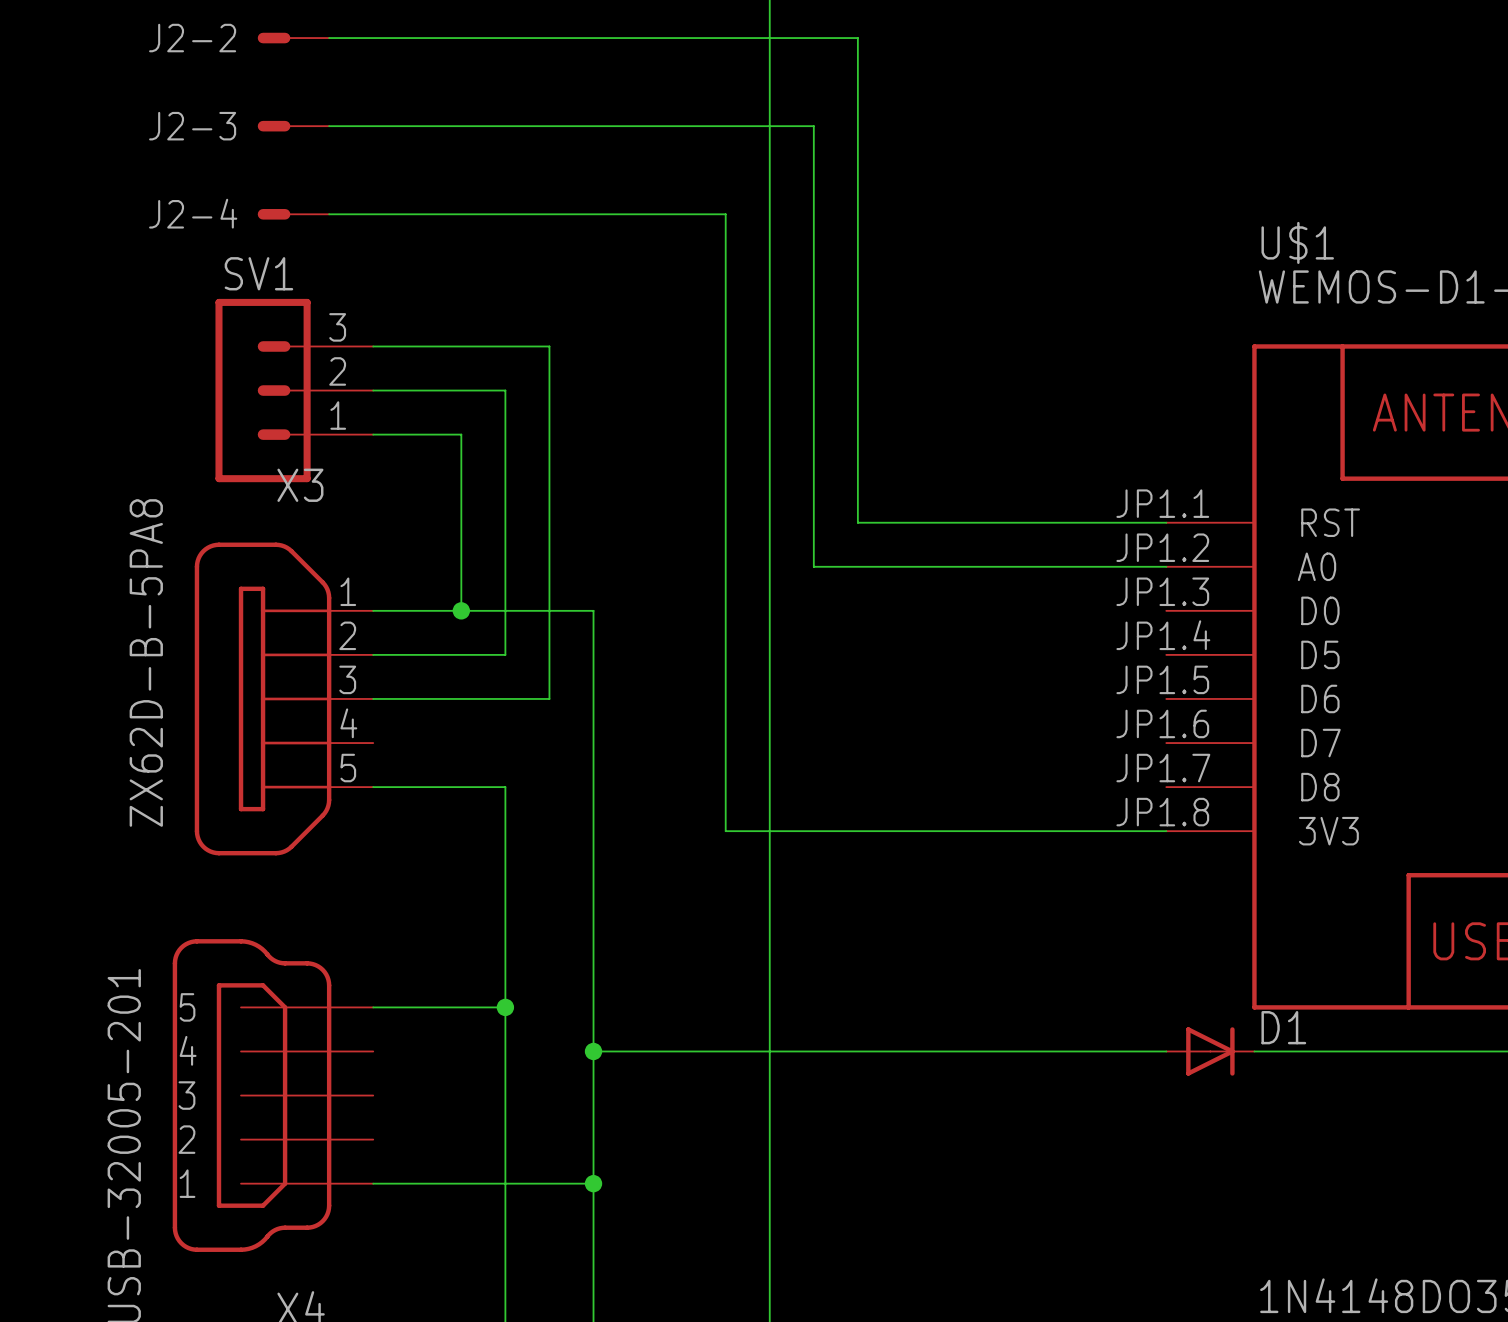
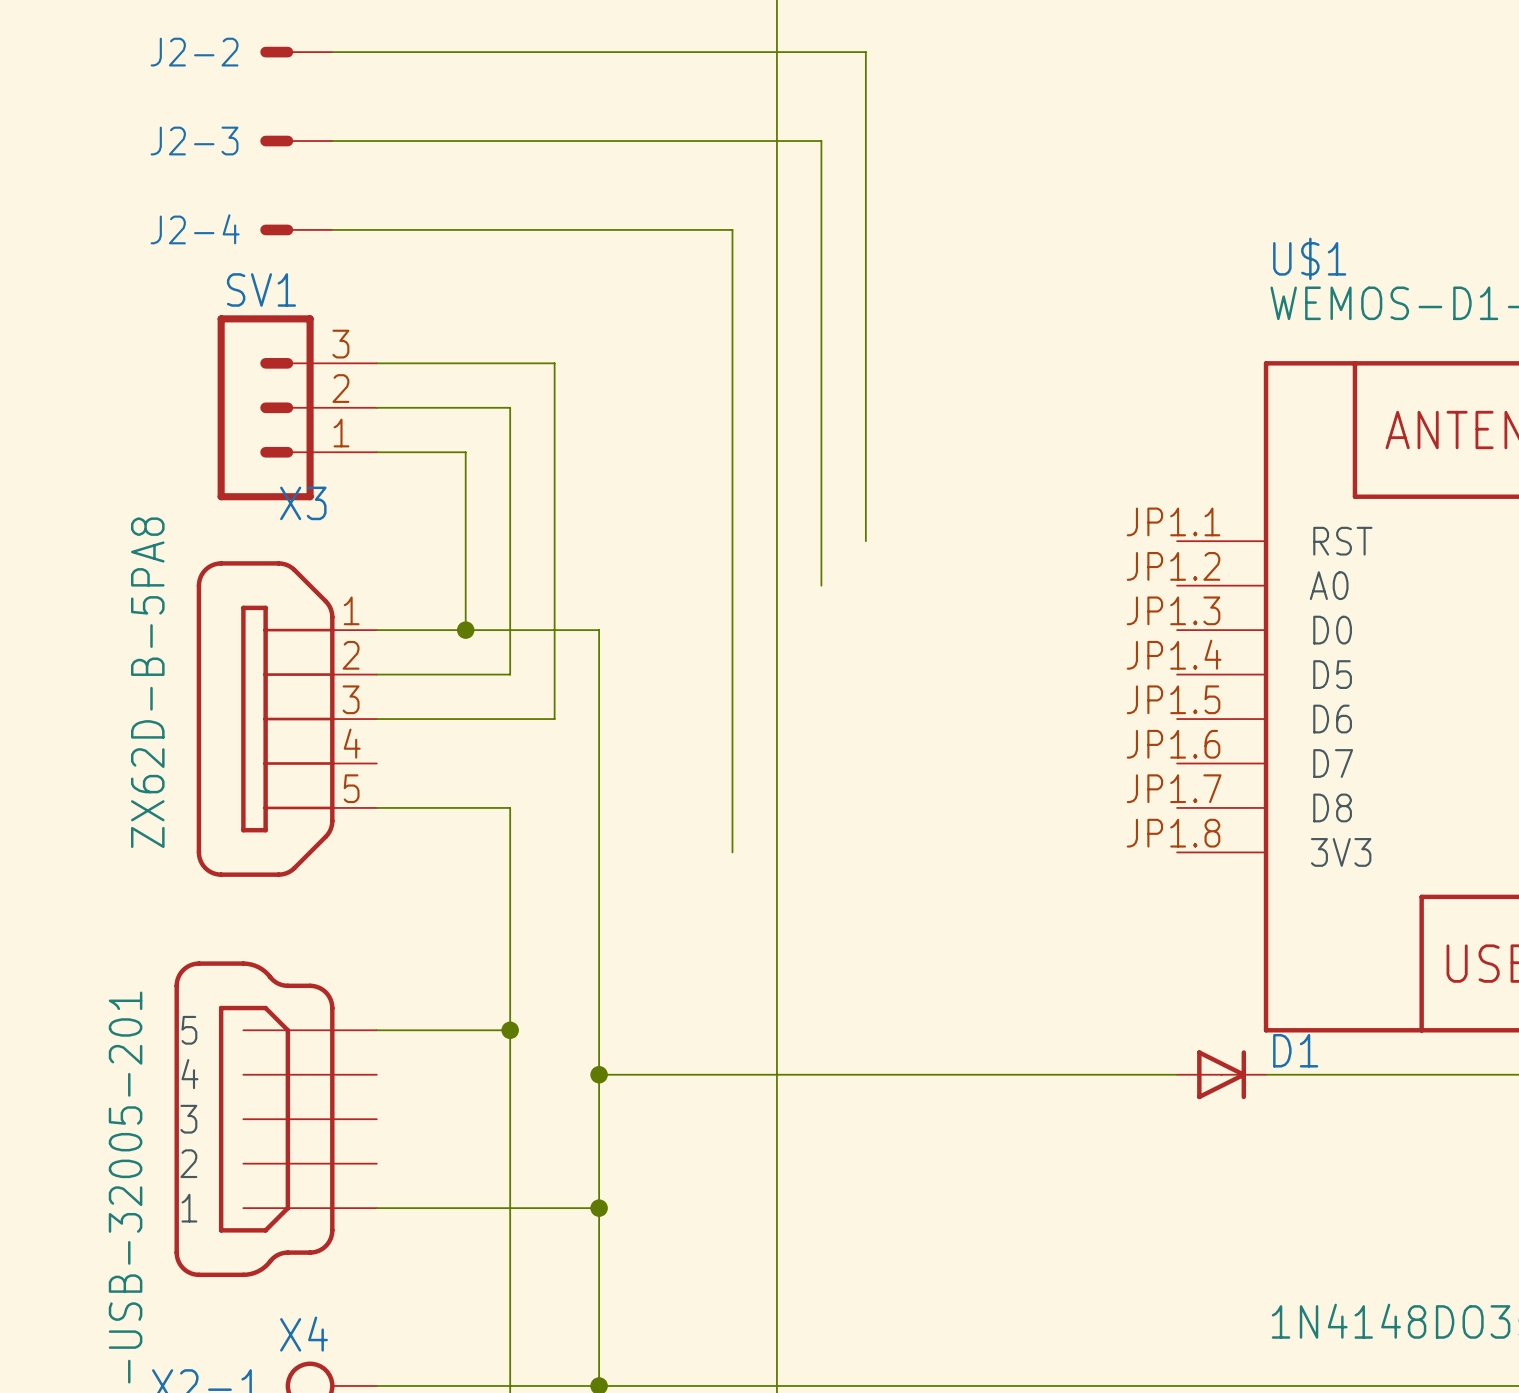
wire: (857, 522) (1166, 522) -> none
wire: (813, 566) (1166, 566) -> none
wire: (725, 831) (1166, 831) -> none

